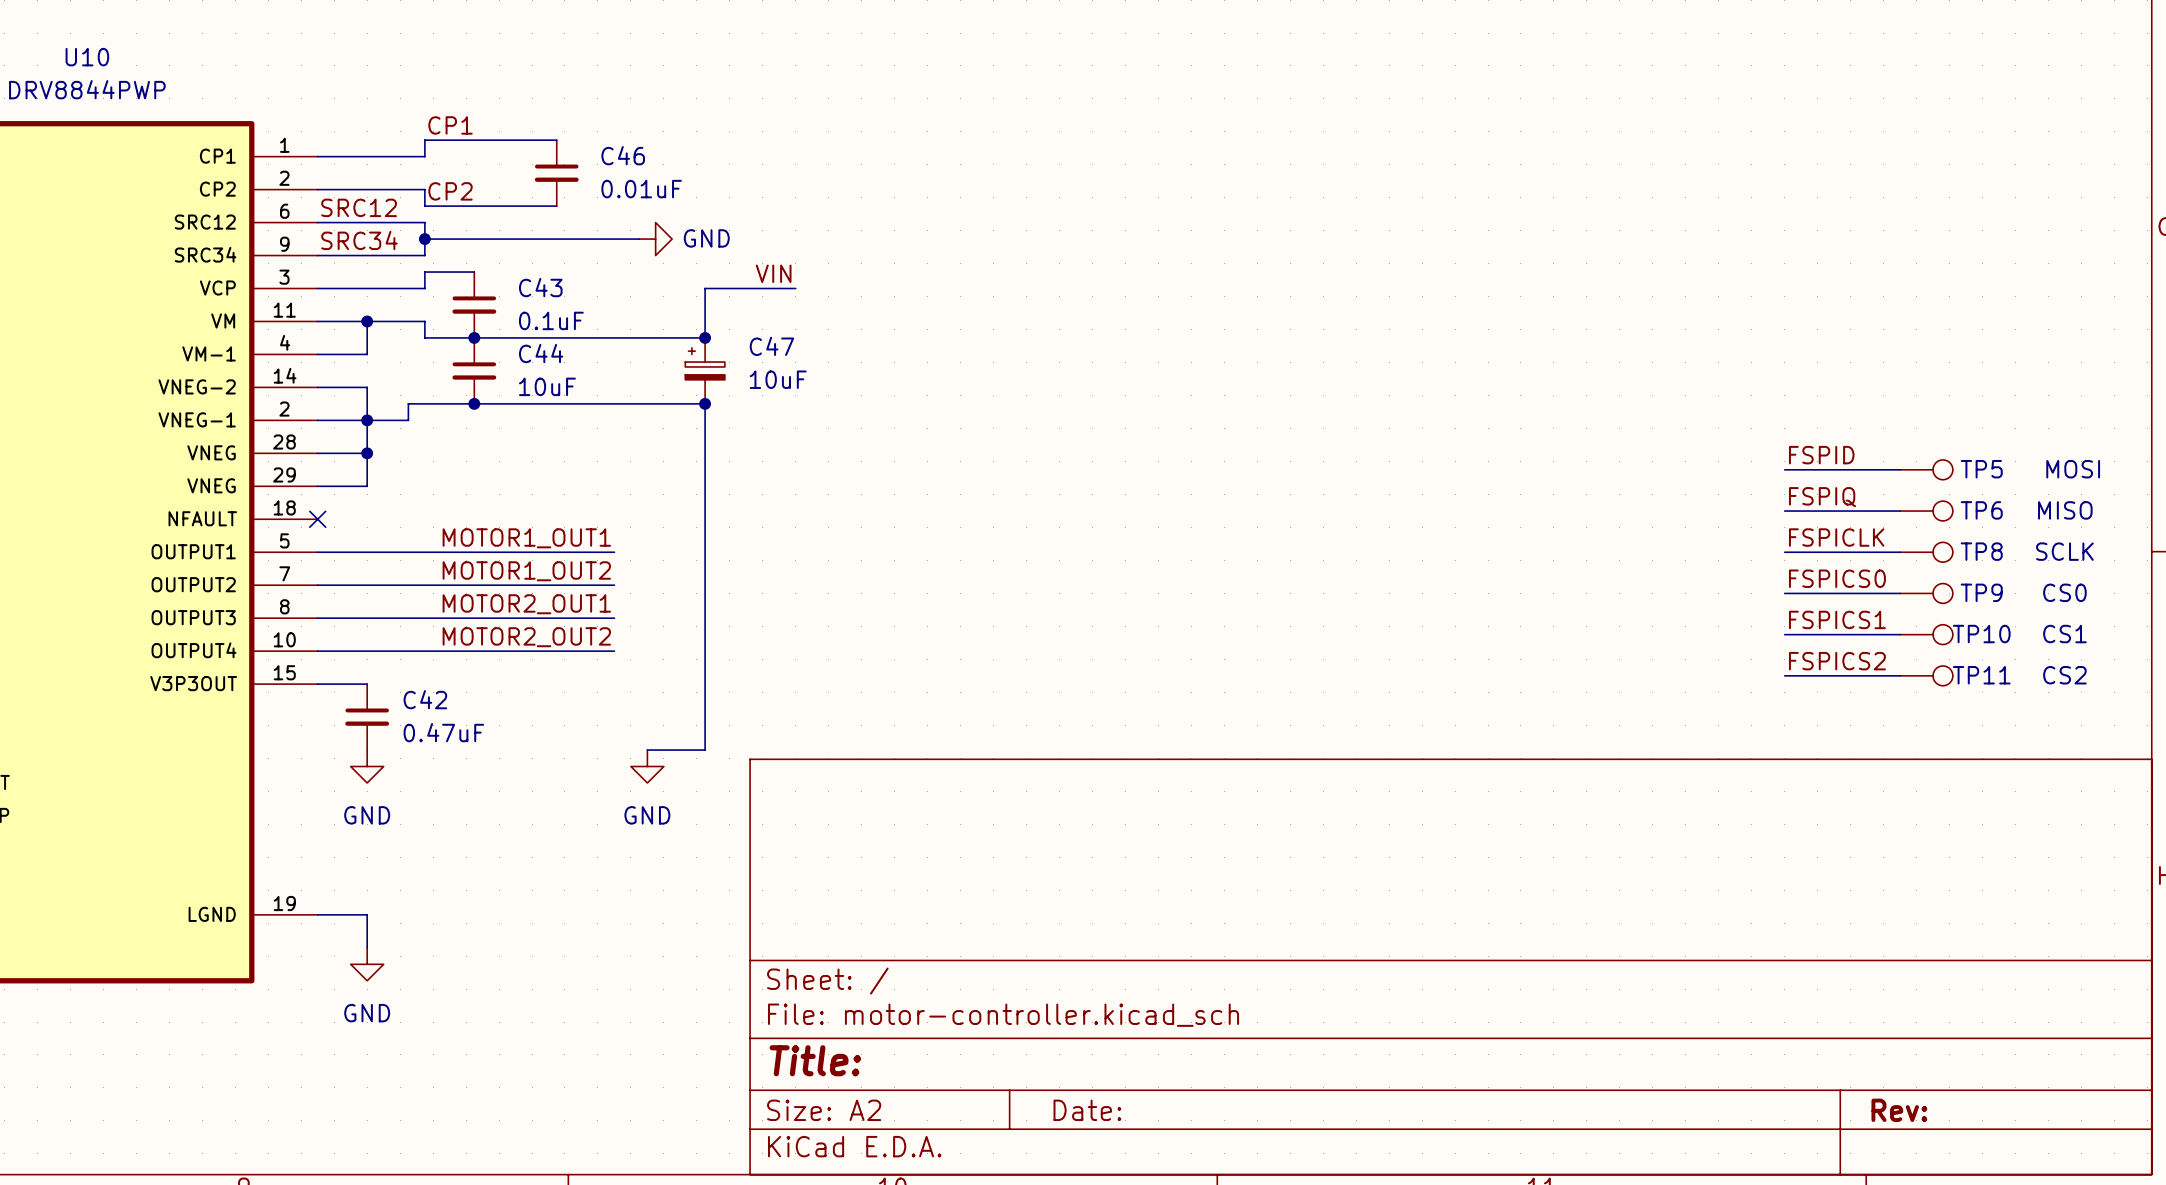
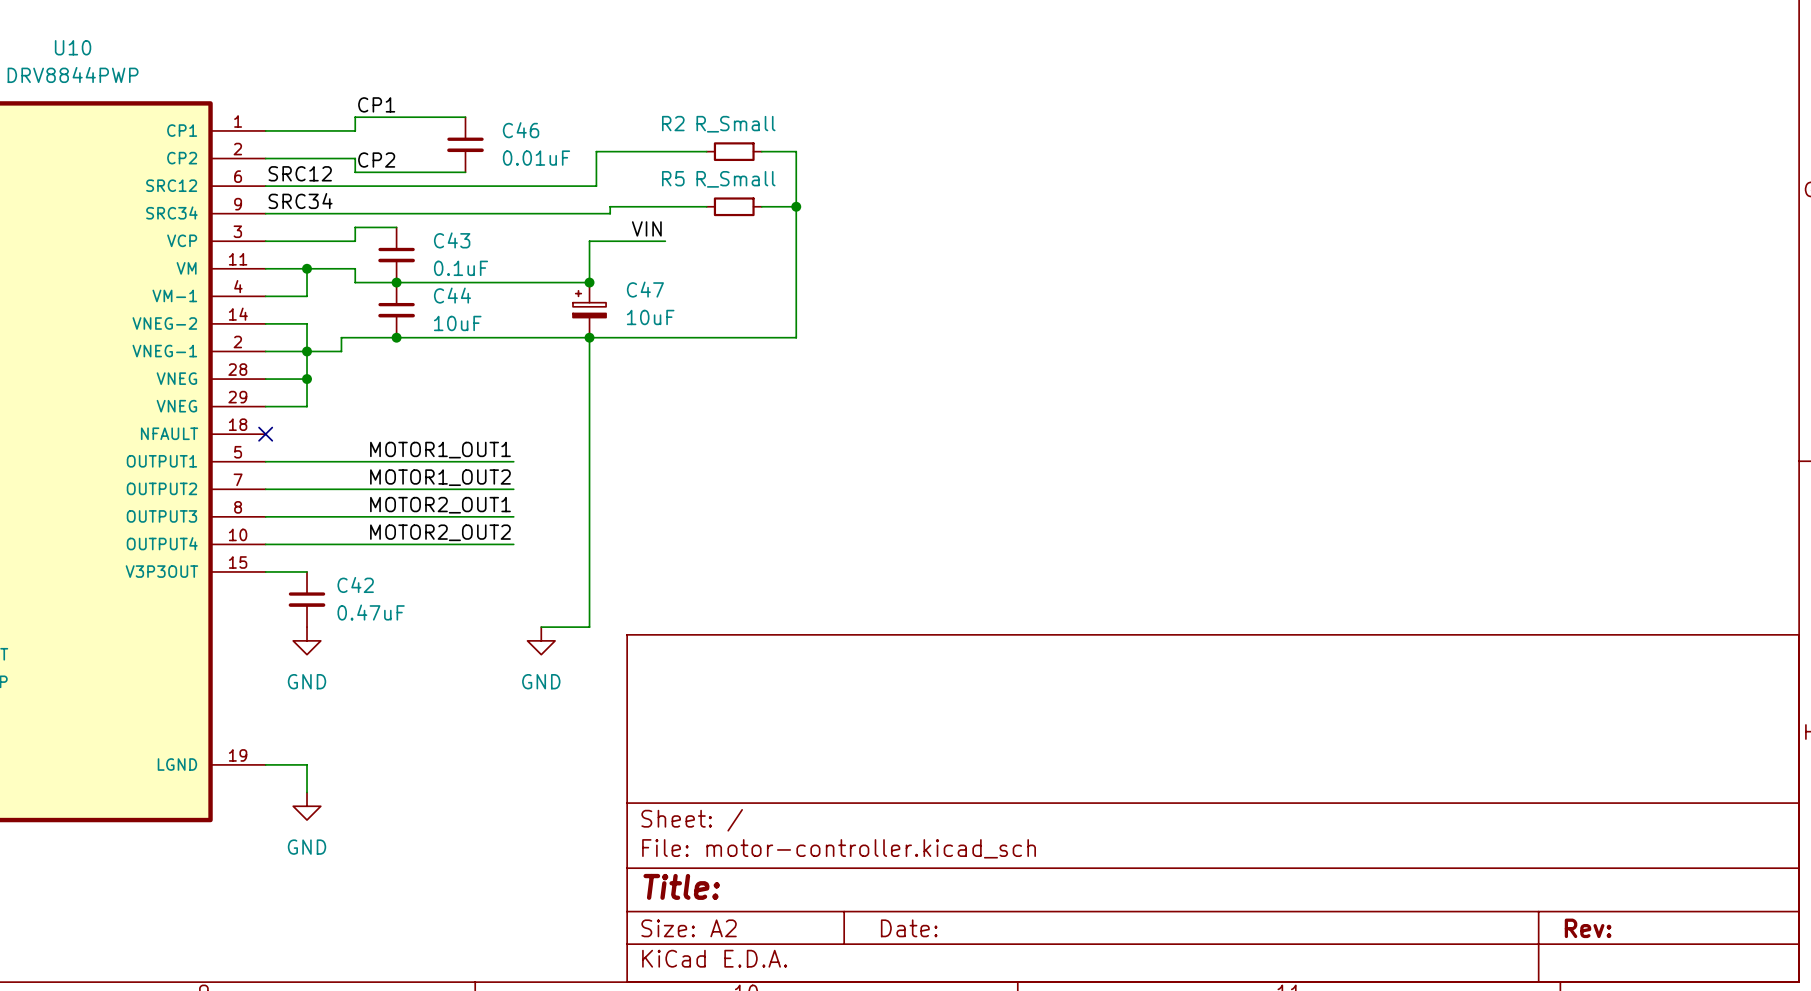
wire: none -> (706, 151) (596, 151) (596, 186) (355, 186)
R2: none -> R_Small (734, 151)
wire: none -> (761, 151) (796, 151) (796, 337) (589, 337)
wire: (424, 222) (424, 255) -> (706, 206) (610, 206) (610, 213) (355, 213)
wire: (424, 239) (639, 239) -> none
junction: (424, 239) -> none
power symbol: GND (655, 239) -> none
R5: none -> R_Small (734, 206)
wire: none -> (761, 206) (796, 206)
junction: none -> (796, 206)
label: FSPID (1821, 455) -> none
wire: (1784, 469) (1900, 469) -> none
TP5: MOSI (1926, 469) -> none
label: FSPIQ (1822, 497) -> none
wire: (1784, 511) (1900, 511) -> none
TP6: MISO (1926, 511) -> none
label: FSPICLK (1836, 537) -> none
wire: (1784, 552) (1900, 552) -> none
TP8: SCLK (1926, 552) -> none
label: FSPICS0 (1837, 578) -> none
wire: (1784, 593) (1900, 593) -> none
TP9: CS0 (1926, 593) -> none
label: FSPICS1 (1837, 619) -> none
wire: (1784, 634) (1900, 634) -> none
TP10: CS1 (1926, 634) -> none
label: FSPICS2 (1837, 661) -> none
wire: (1784, 675) (1900, 675) -> none
TP11: CS2 (1926, 675) -> none

